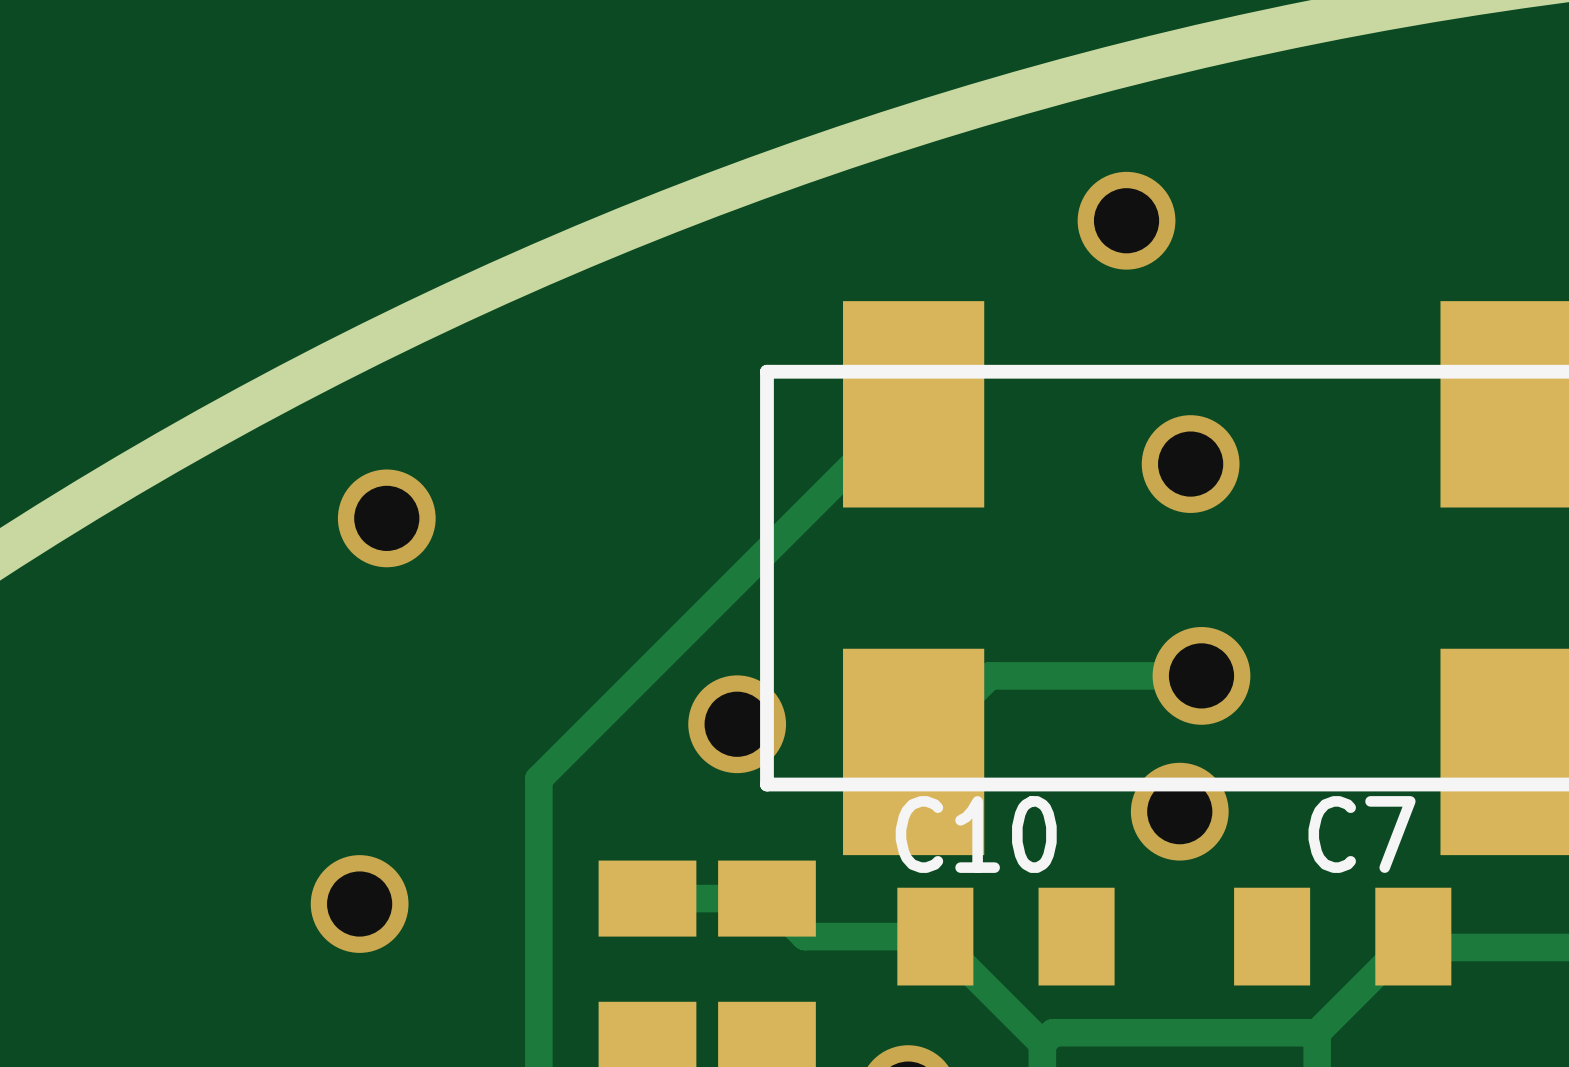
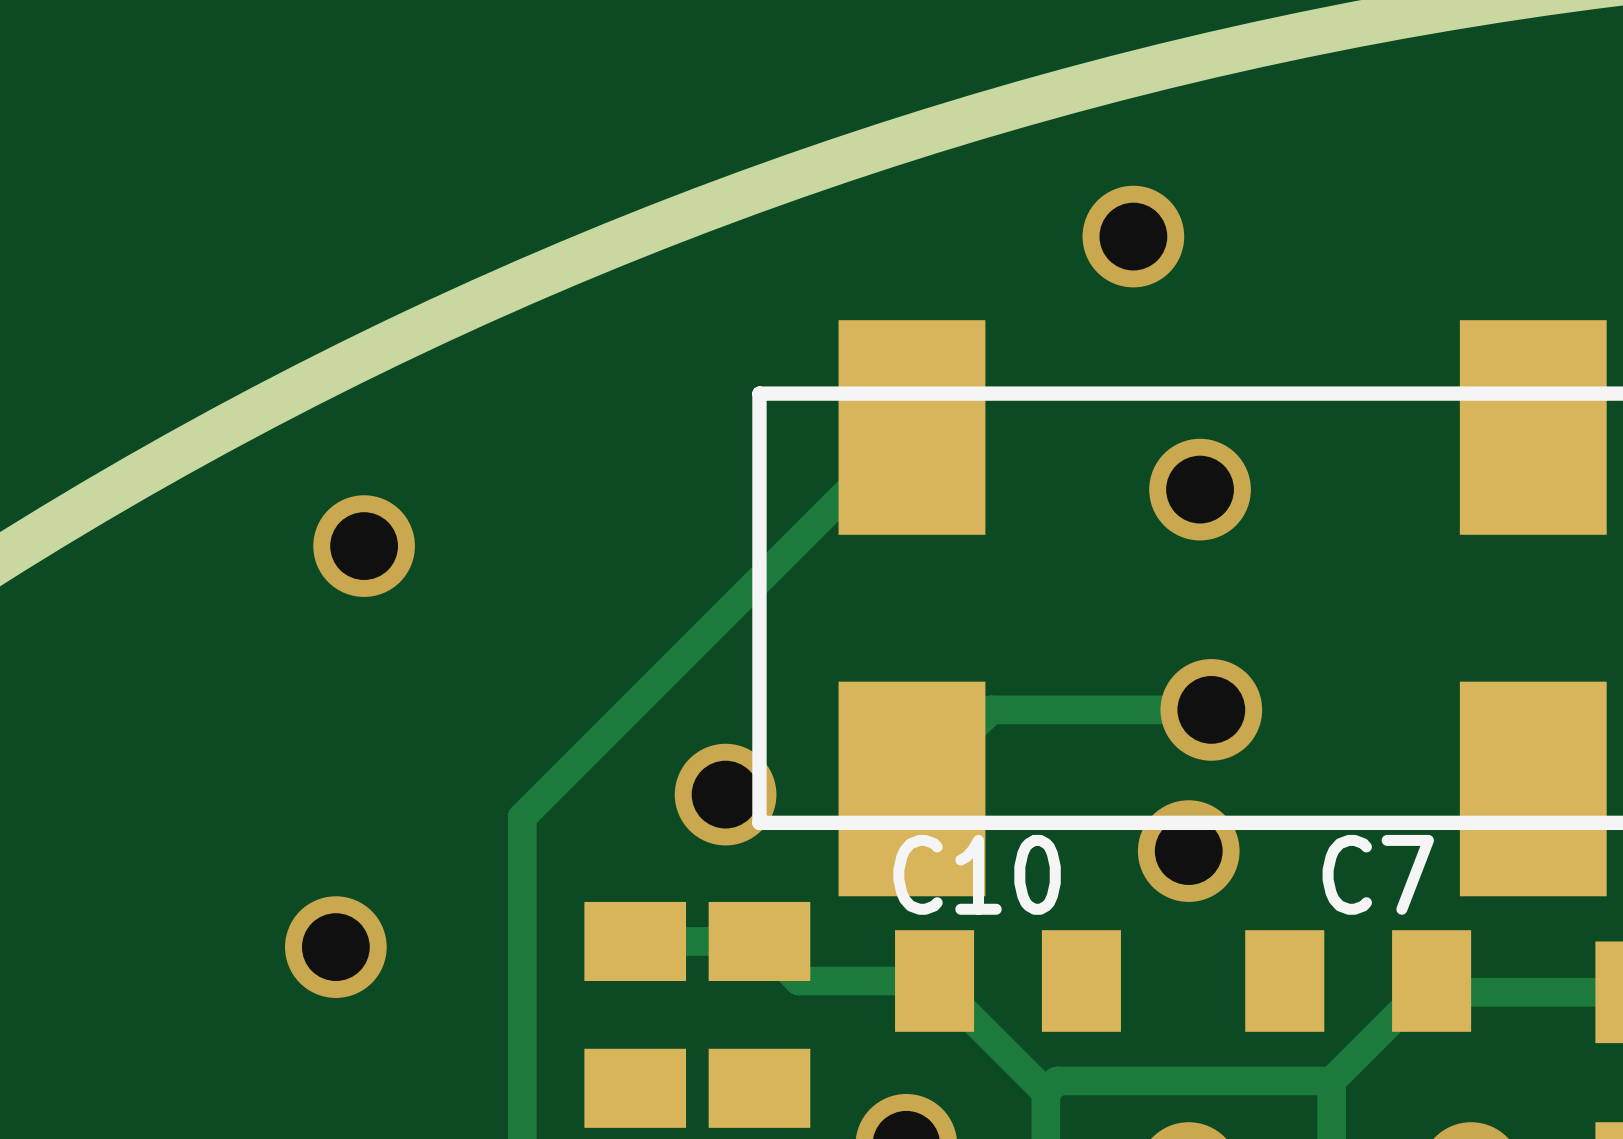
via position: (737, 724) -> (725, 794)

